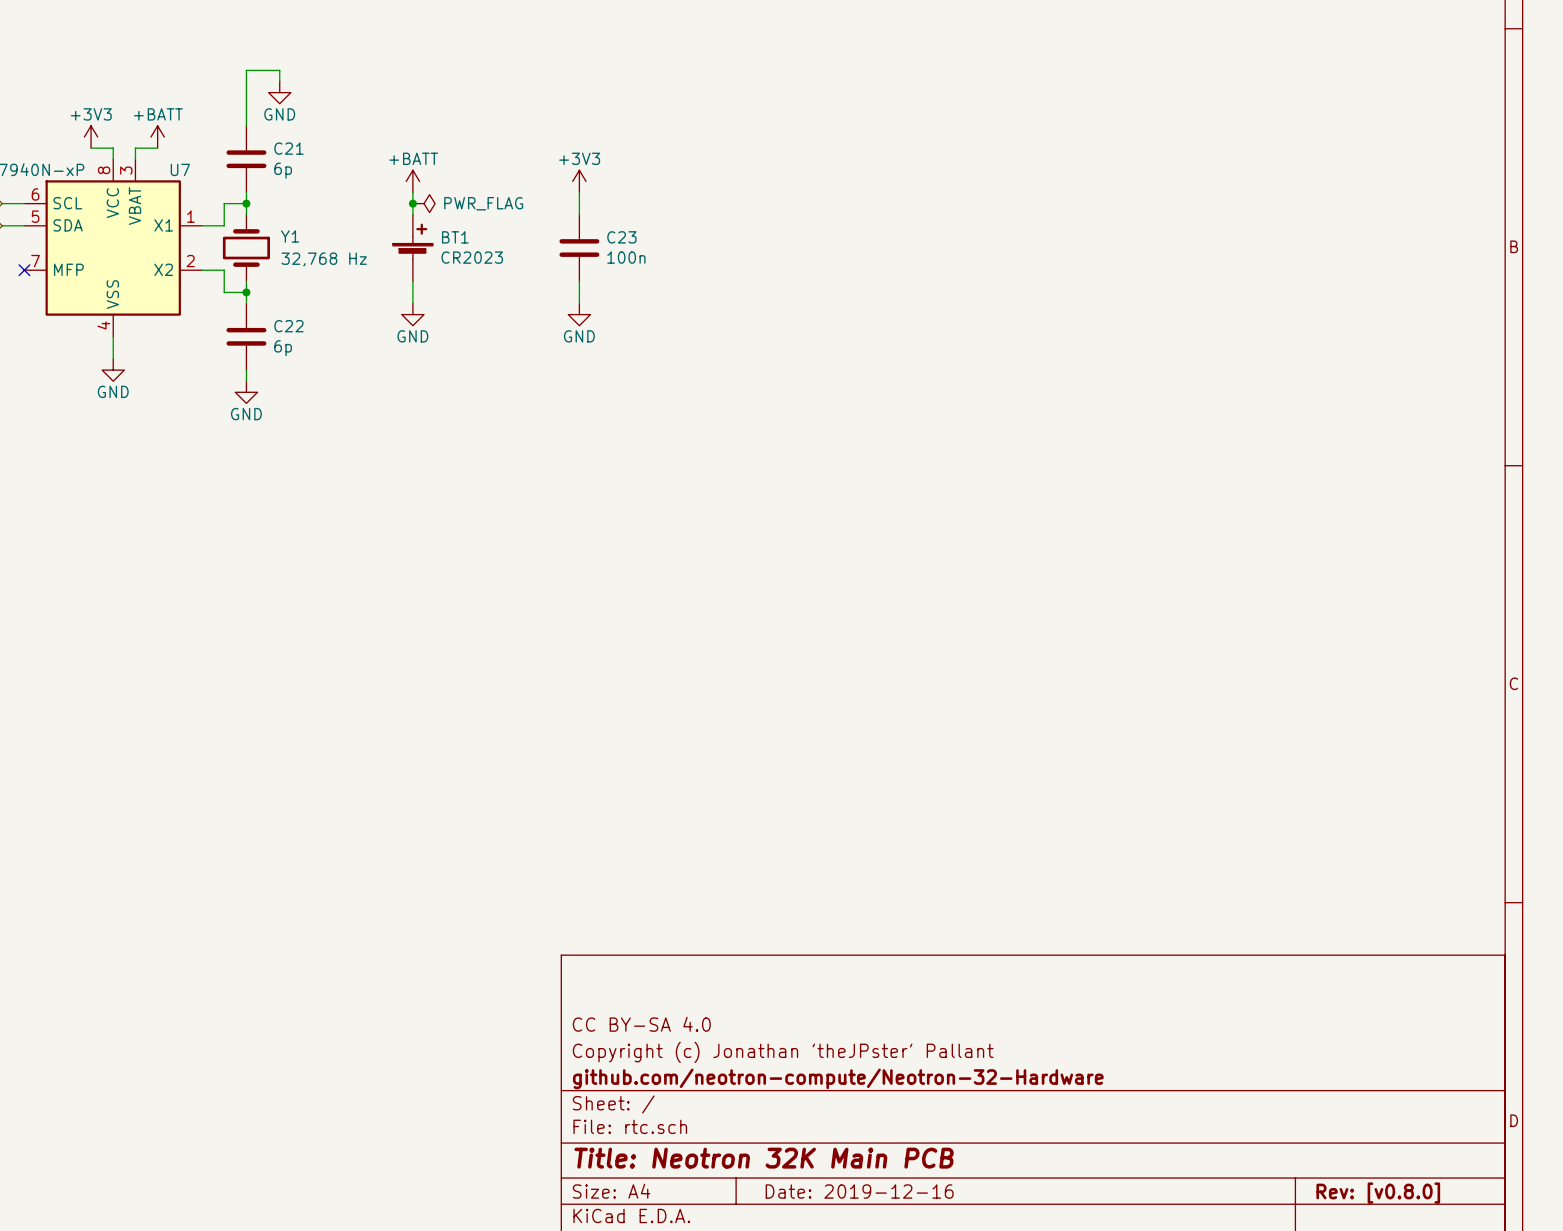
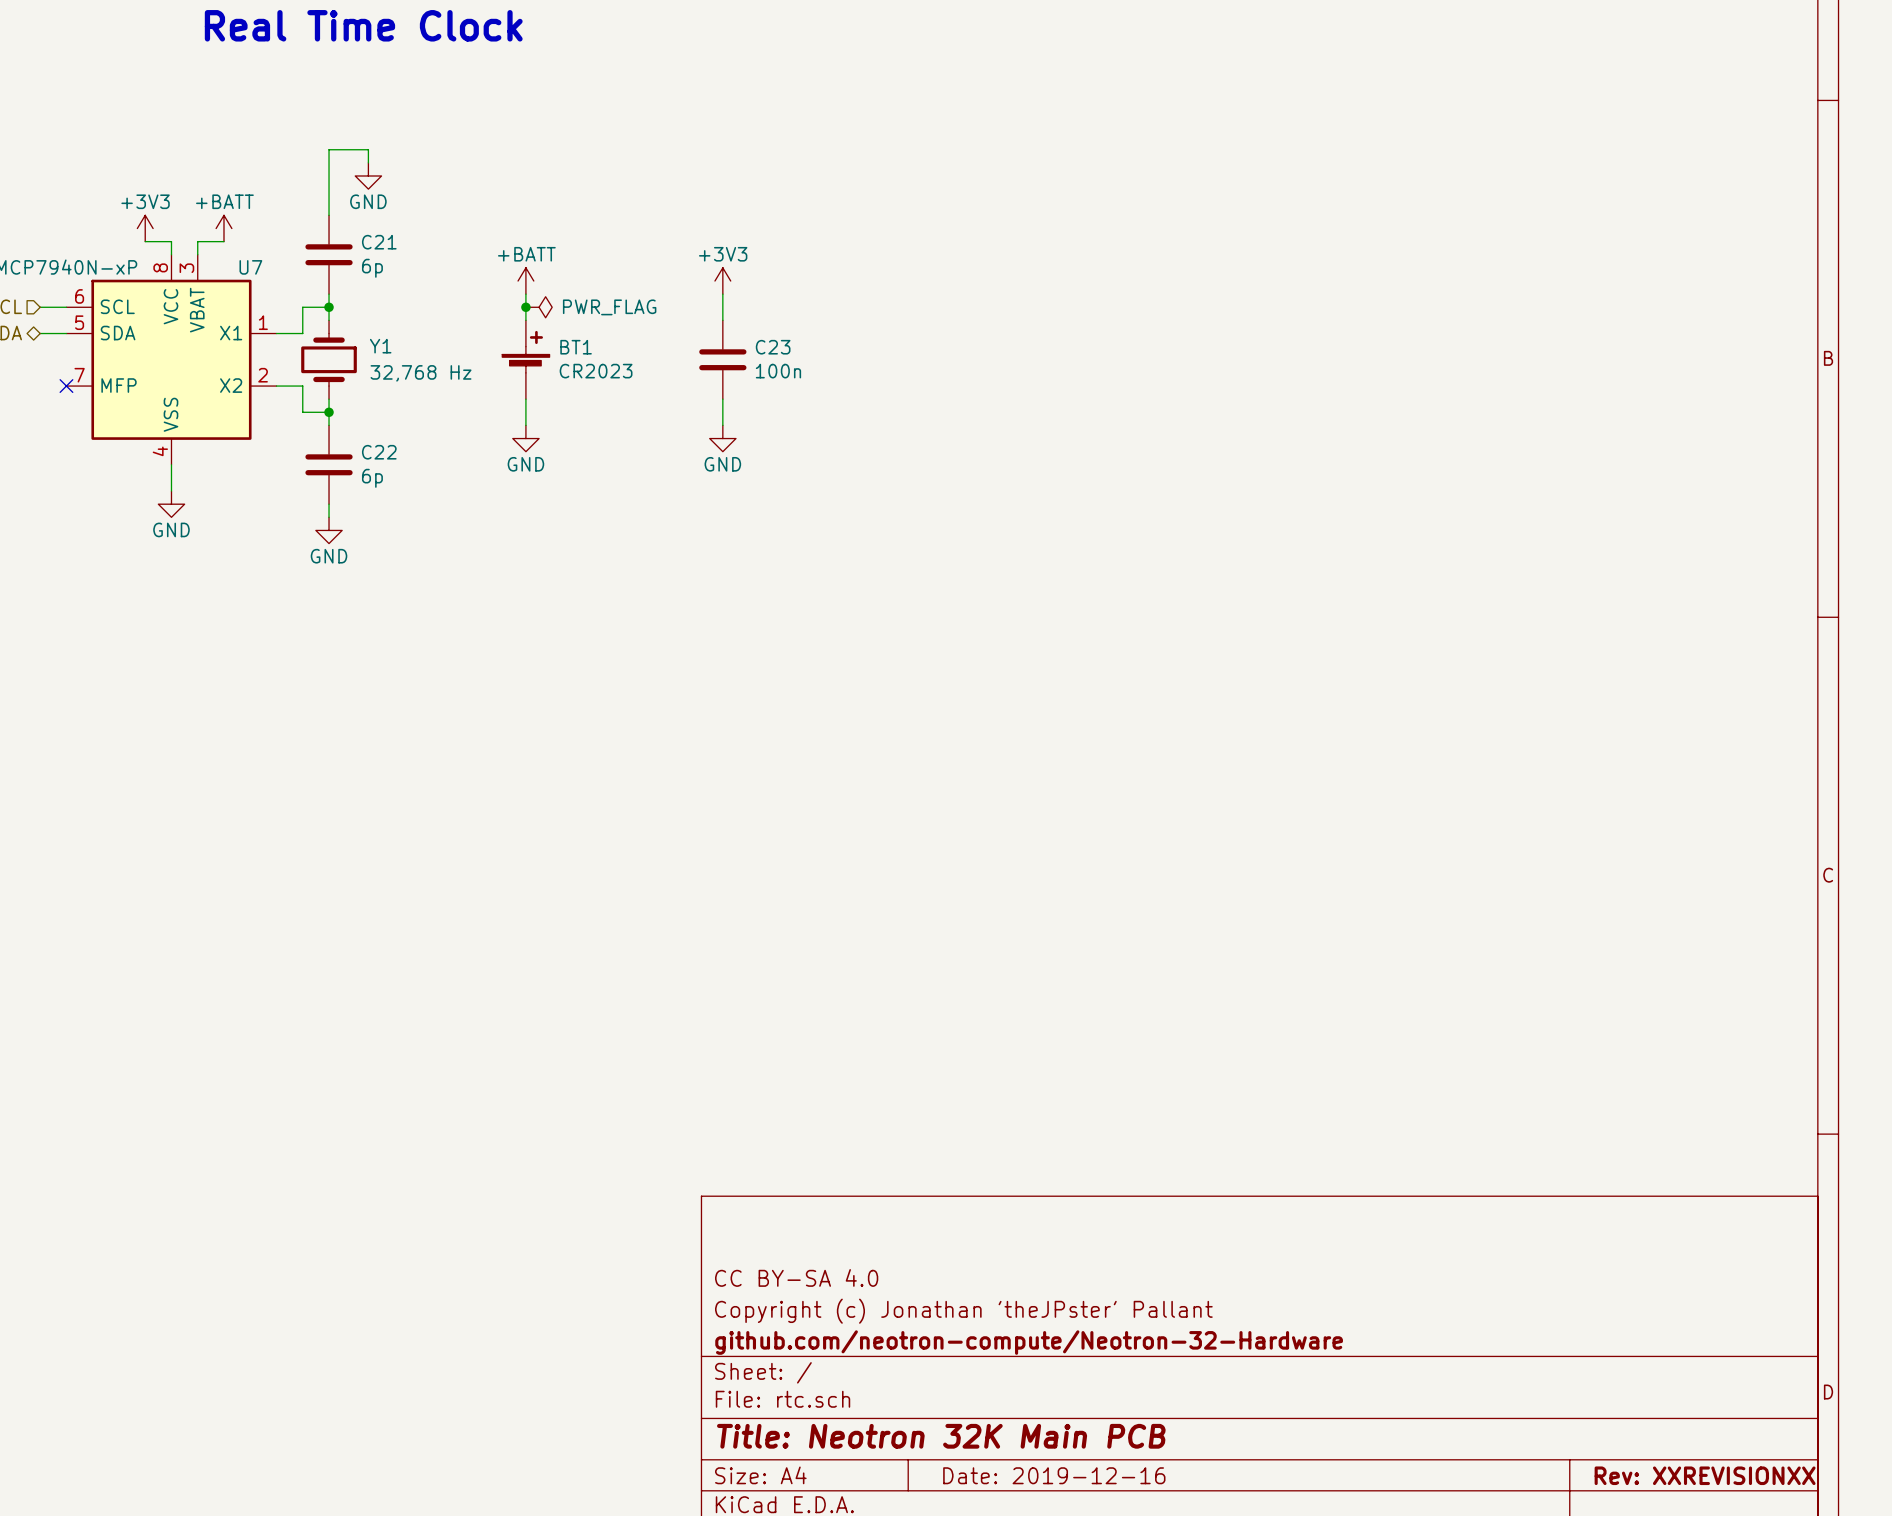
title block: Rev: [v0.8.0] (1378, 1193) -> Rev: XXREVISIONXX (1705, 1475)

